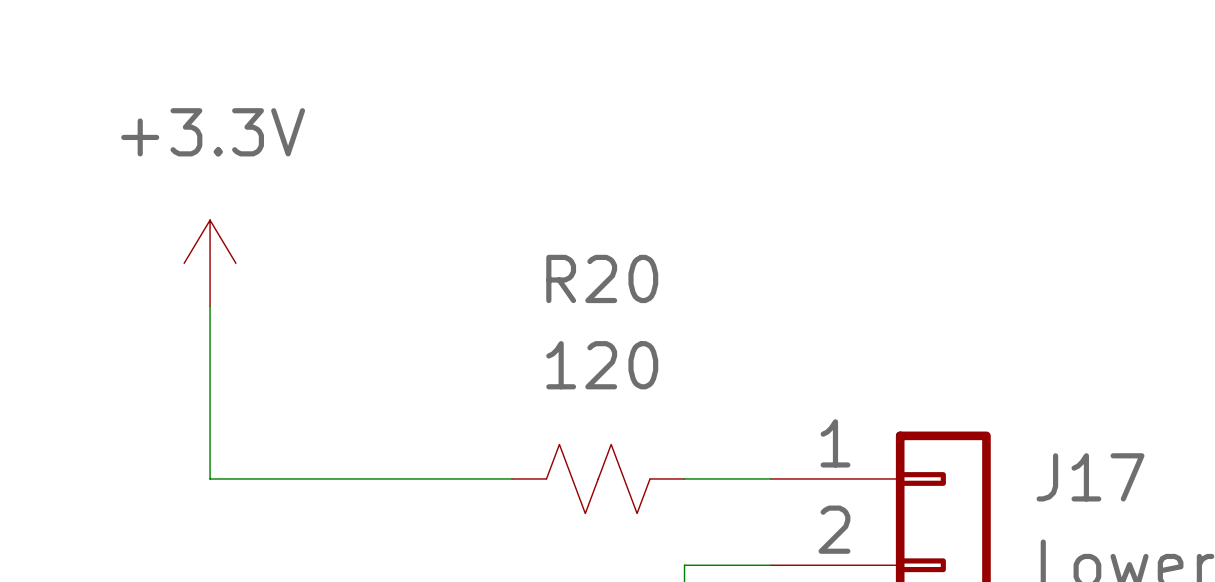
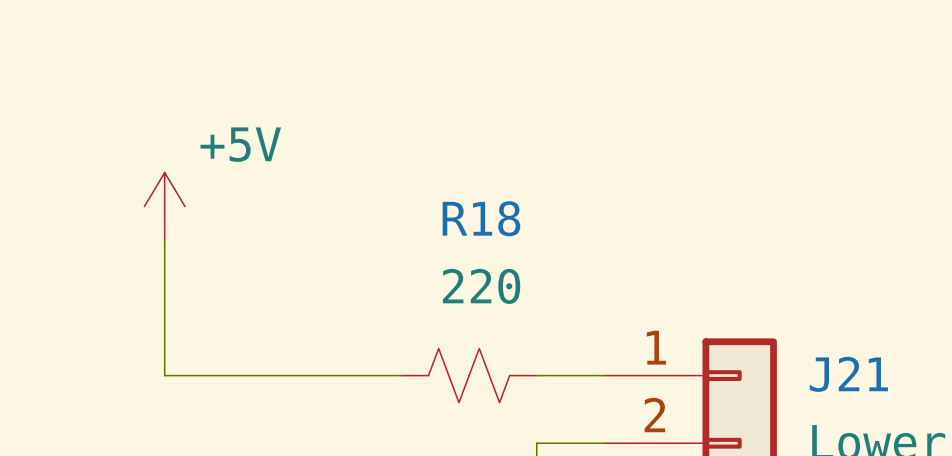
power symbol: +3.3V (210, 263) -> +5V (164, 206)
R20 name: R20 (602, 278) -> R18 (481, 218)
R20 value: 120 (602, 365) -> 220 (481, 286)
J17 name: J17 (1090, 477) -> J21 (848, 374)

